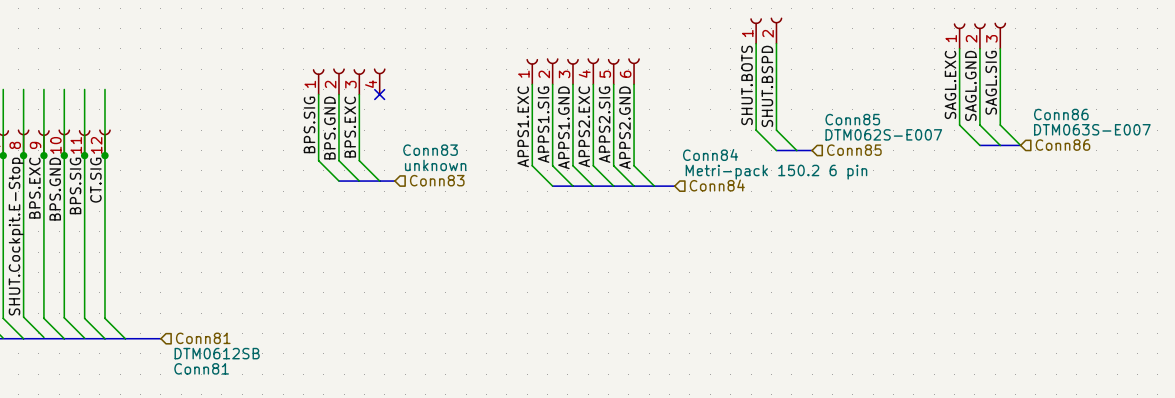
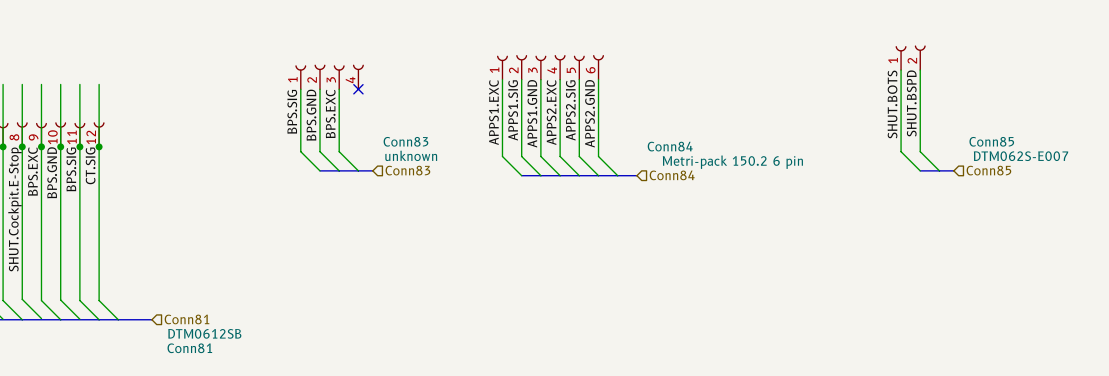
Conn85 position: (766, 30) -> (910, 58)
Conn86: (979, 36) -> none
wire: (756, 43) (756, 130) (776, 150) -> none
wire: (776, 43) (776, 130) (796, 150) -> (901, 70) (901, 151) (920, 170)
wire: (959, 48) (959, 125) (979, 145) -> none
wire: (979, 48) (979, 125) (1000, 145) -> none
wire: (1000, 48) (1000, 125) (1020, 145) -> none
wire: none -> (920, 70) (920, 151) (939, 170)
label: SAGL.SIG (991, 82) -> none
label: SAGL.EXC (950, 84) -> none
label: SHUT.BOTS (747, 85) -> none
label: SAGL.GND (970, 85) -> none
label: SHUT.BSPD (767, 86) -> none
label: none -> SHUT.BOTS (892, 104)
label: none -> SHUT.BSPD (911, 103)
bus: (979, 145) (1020, 145) -> none
hierarchical label: Conn86 (1062, 145) -> none
bus: (776, 150) (812, 150) -> none
hierarchical label: Conn85 (854, 150) -> none
hierarchical label: none -> Conn85 (988, 170)
bus: none -> (920, 170) (953, 170)

